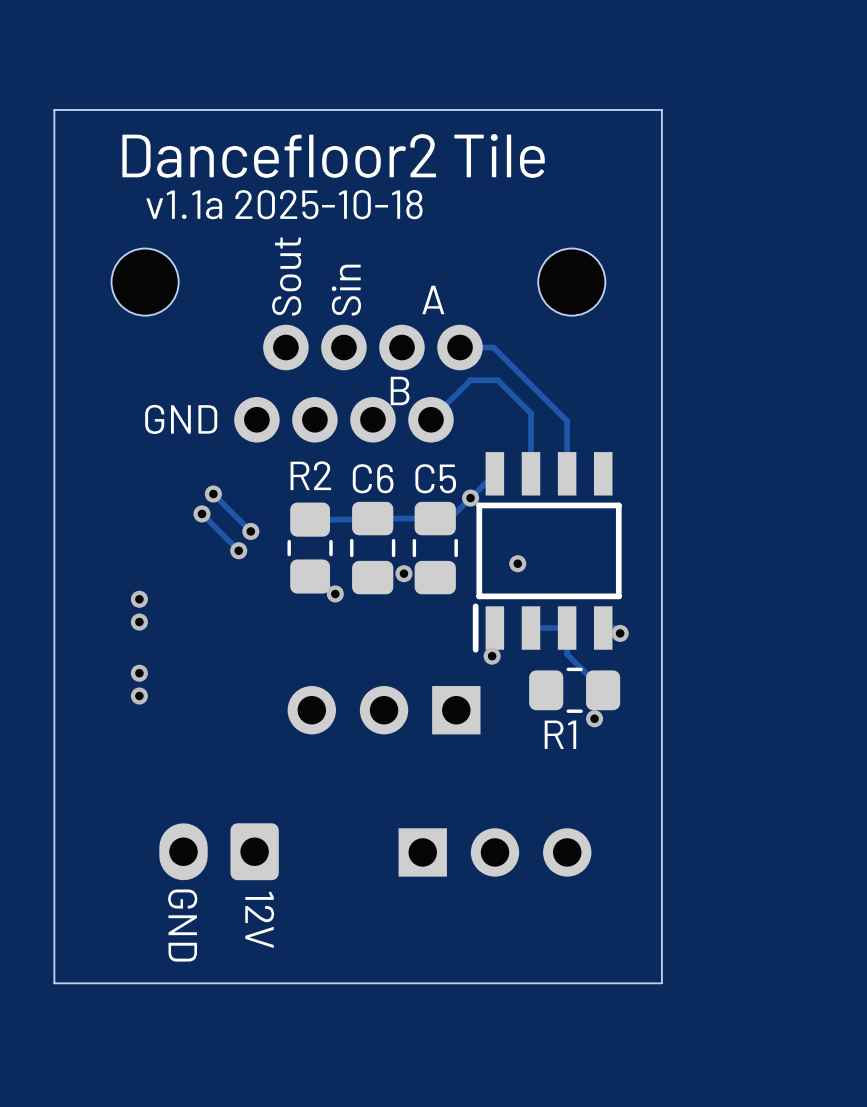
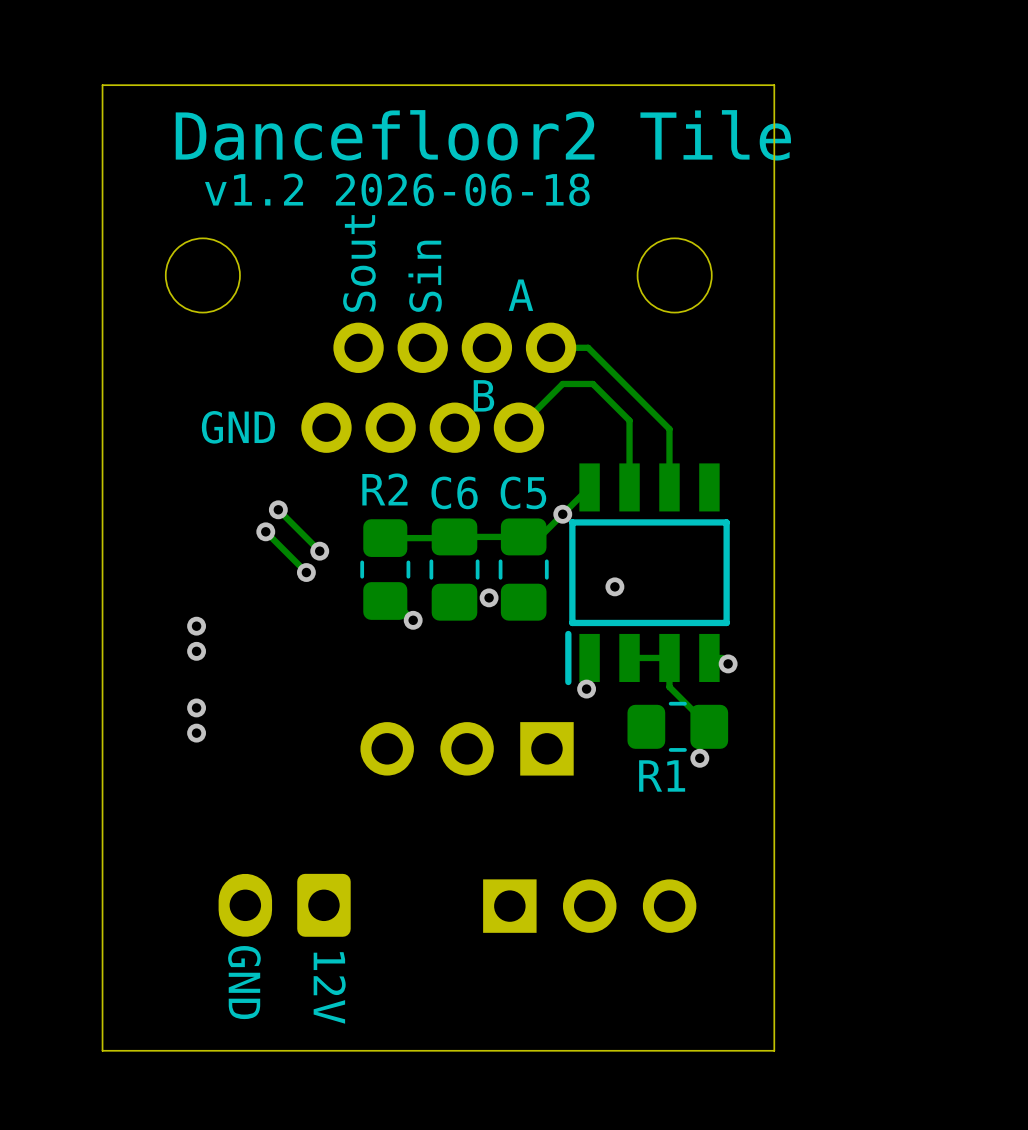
text: v1.1a 2025-10-18 (284, 204) -> v1.2 2026-06-18 (397, 189)

